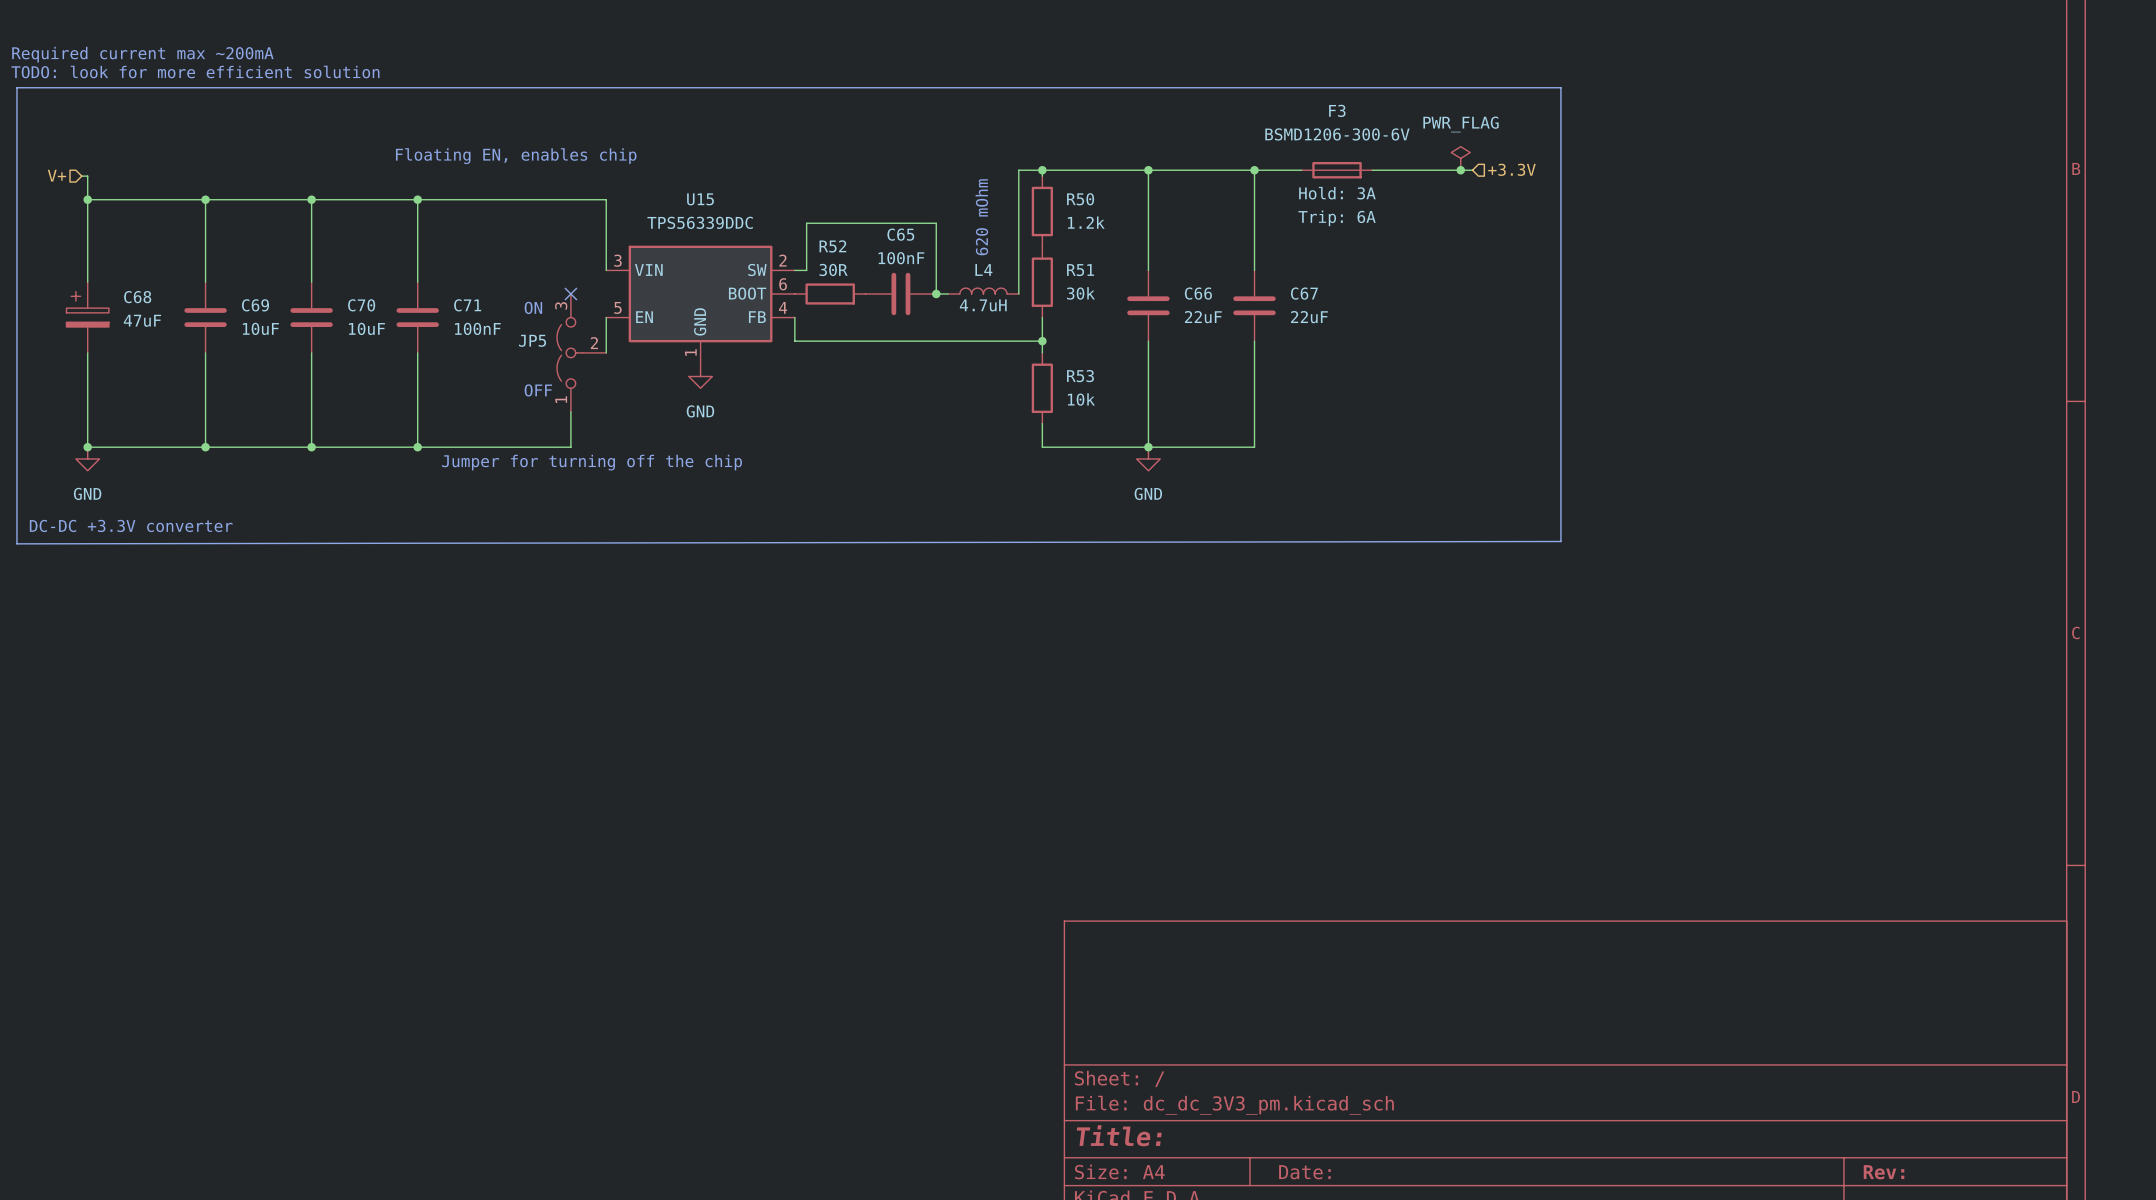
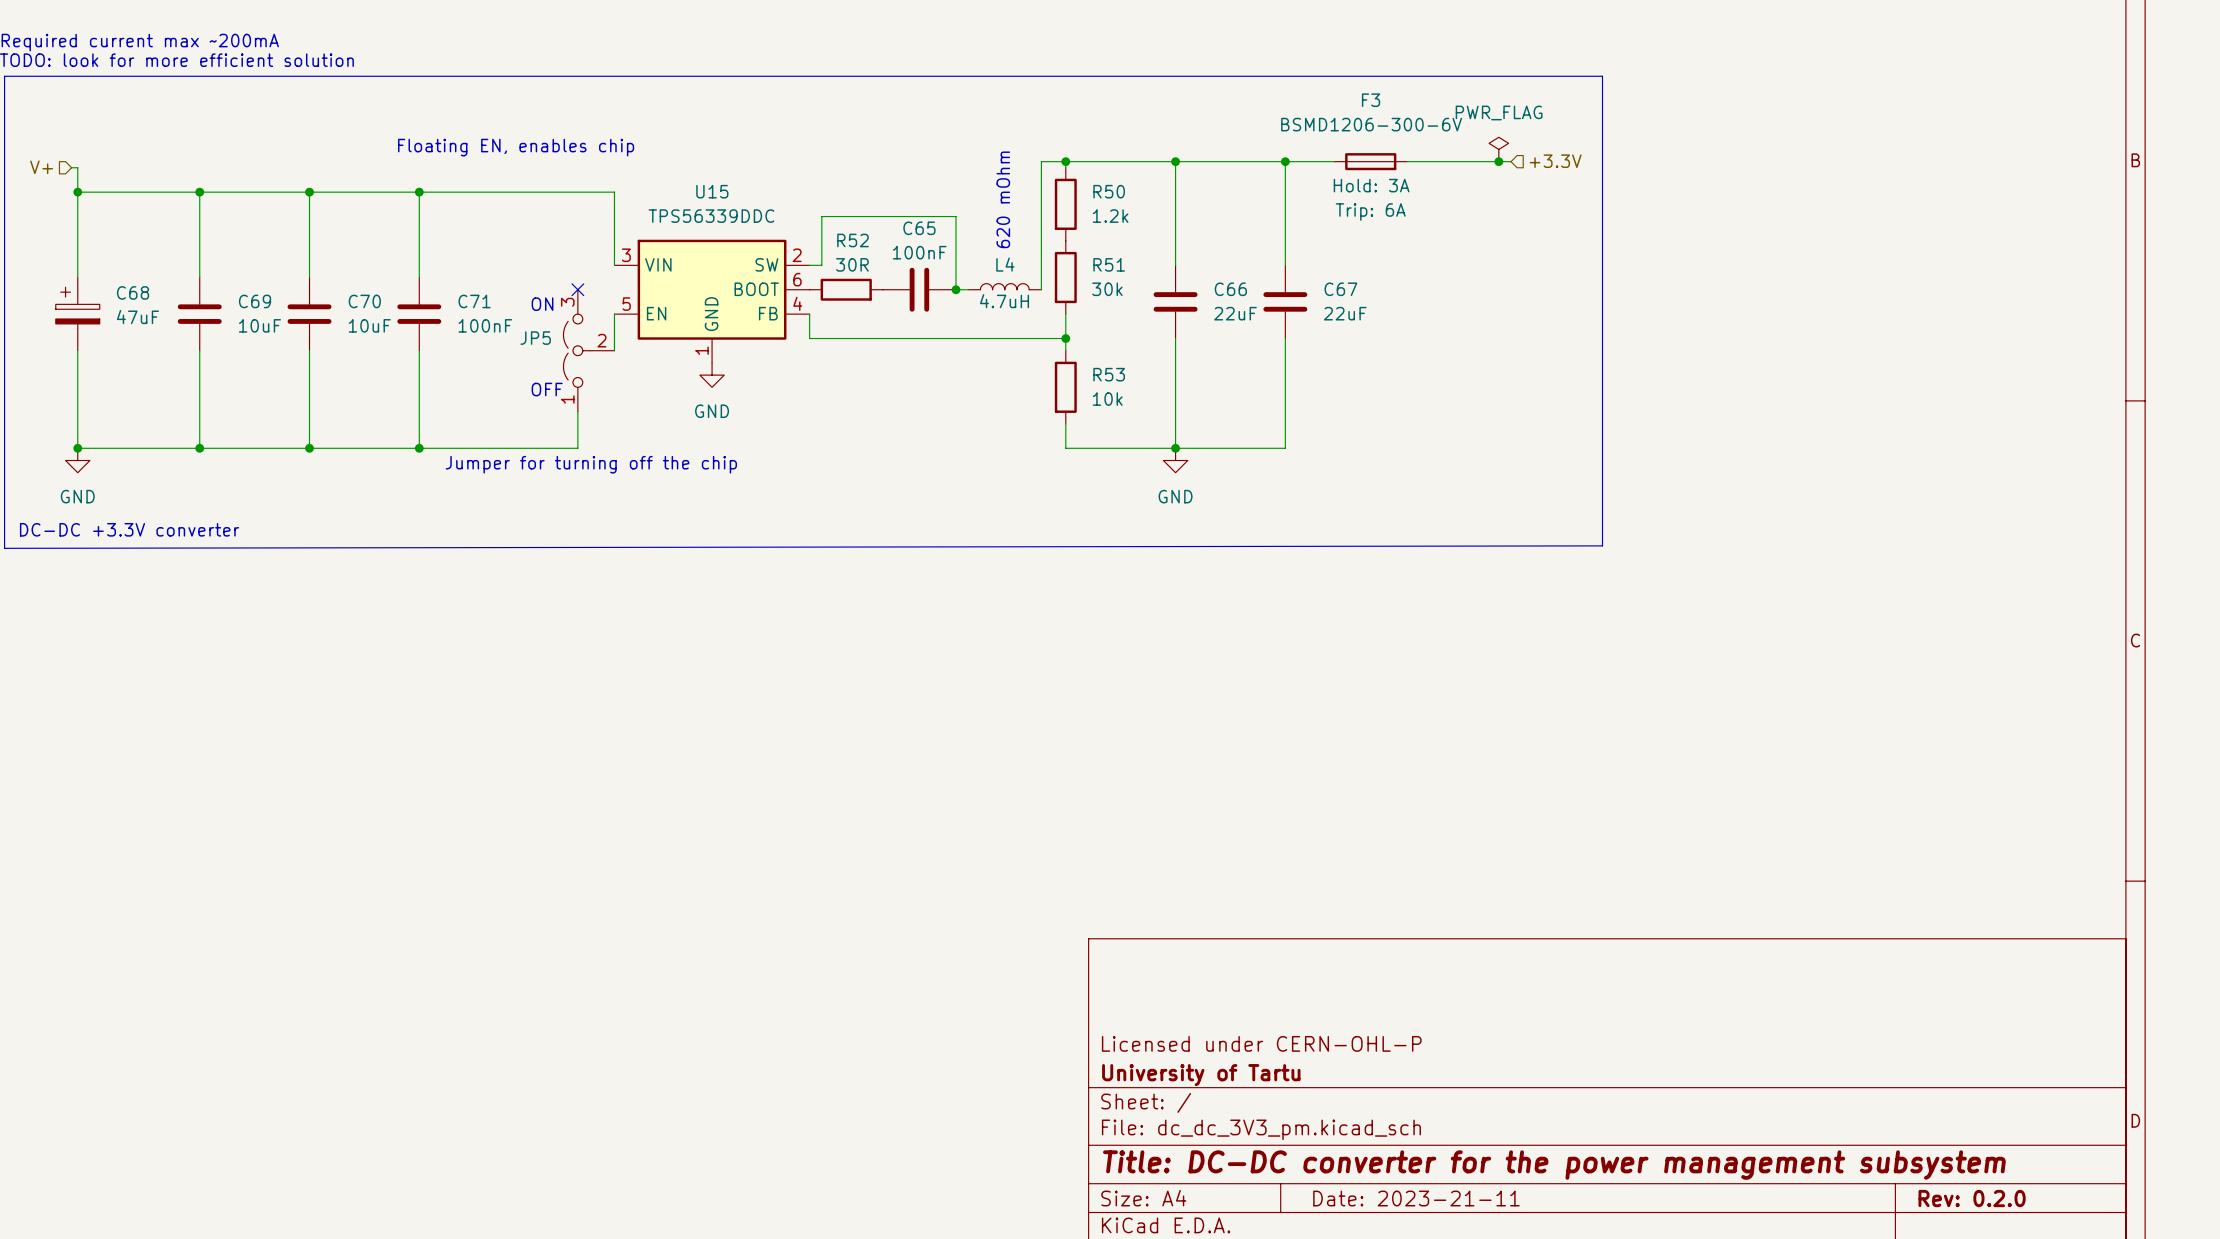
title block: none -> Licensed under CERN-OHL-P (1261, 1043)
title block: none -> University of Tartu (1201, 1075)
title block: Title: (1119, 1135) -> Title: DC-DC converter for the power management subsystem (1554, 1165)
title block: Date: (1304, 1172) -> Date: 2023-21-11 (1416, 1198)
title block: Rev: (1884, 1172) -> Rev: 0.2.0 (1972, 1198)

